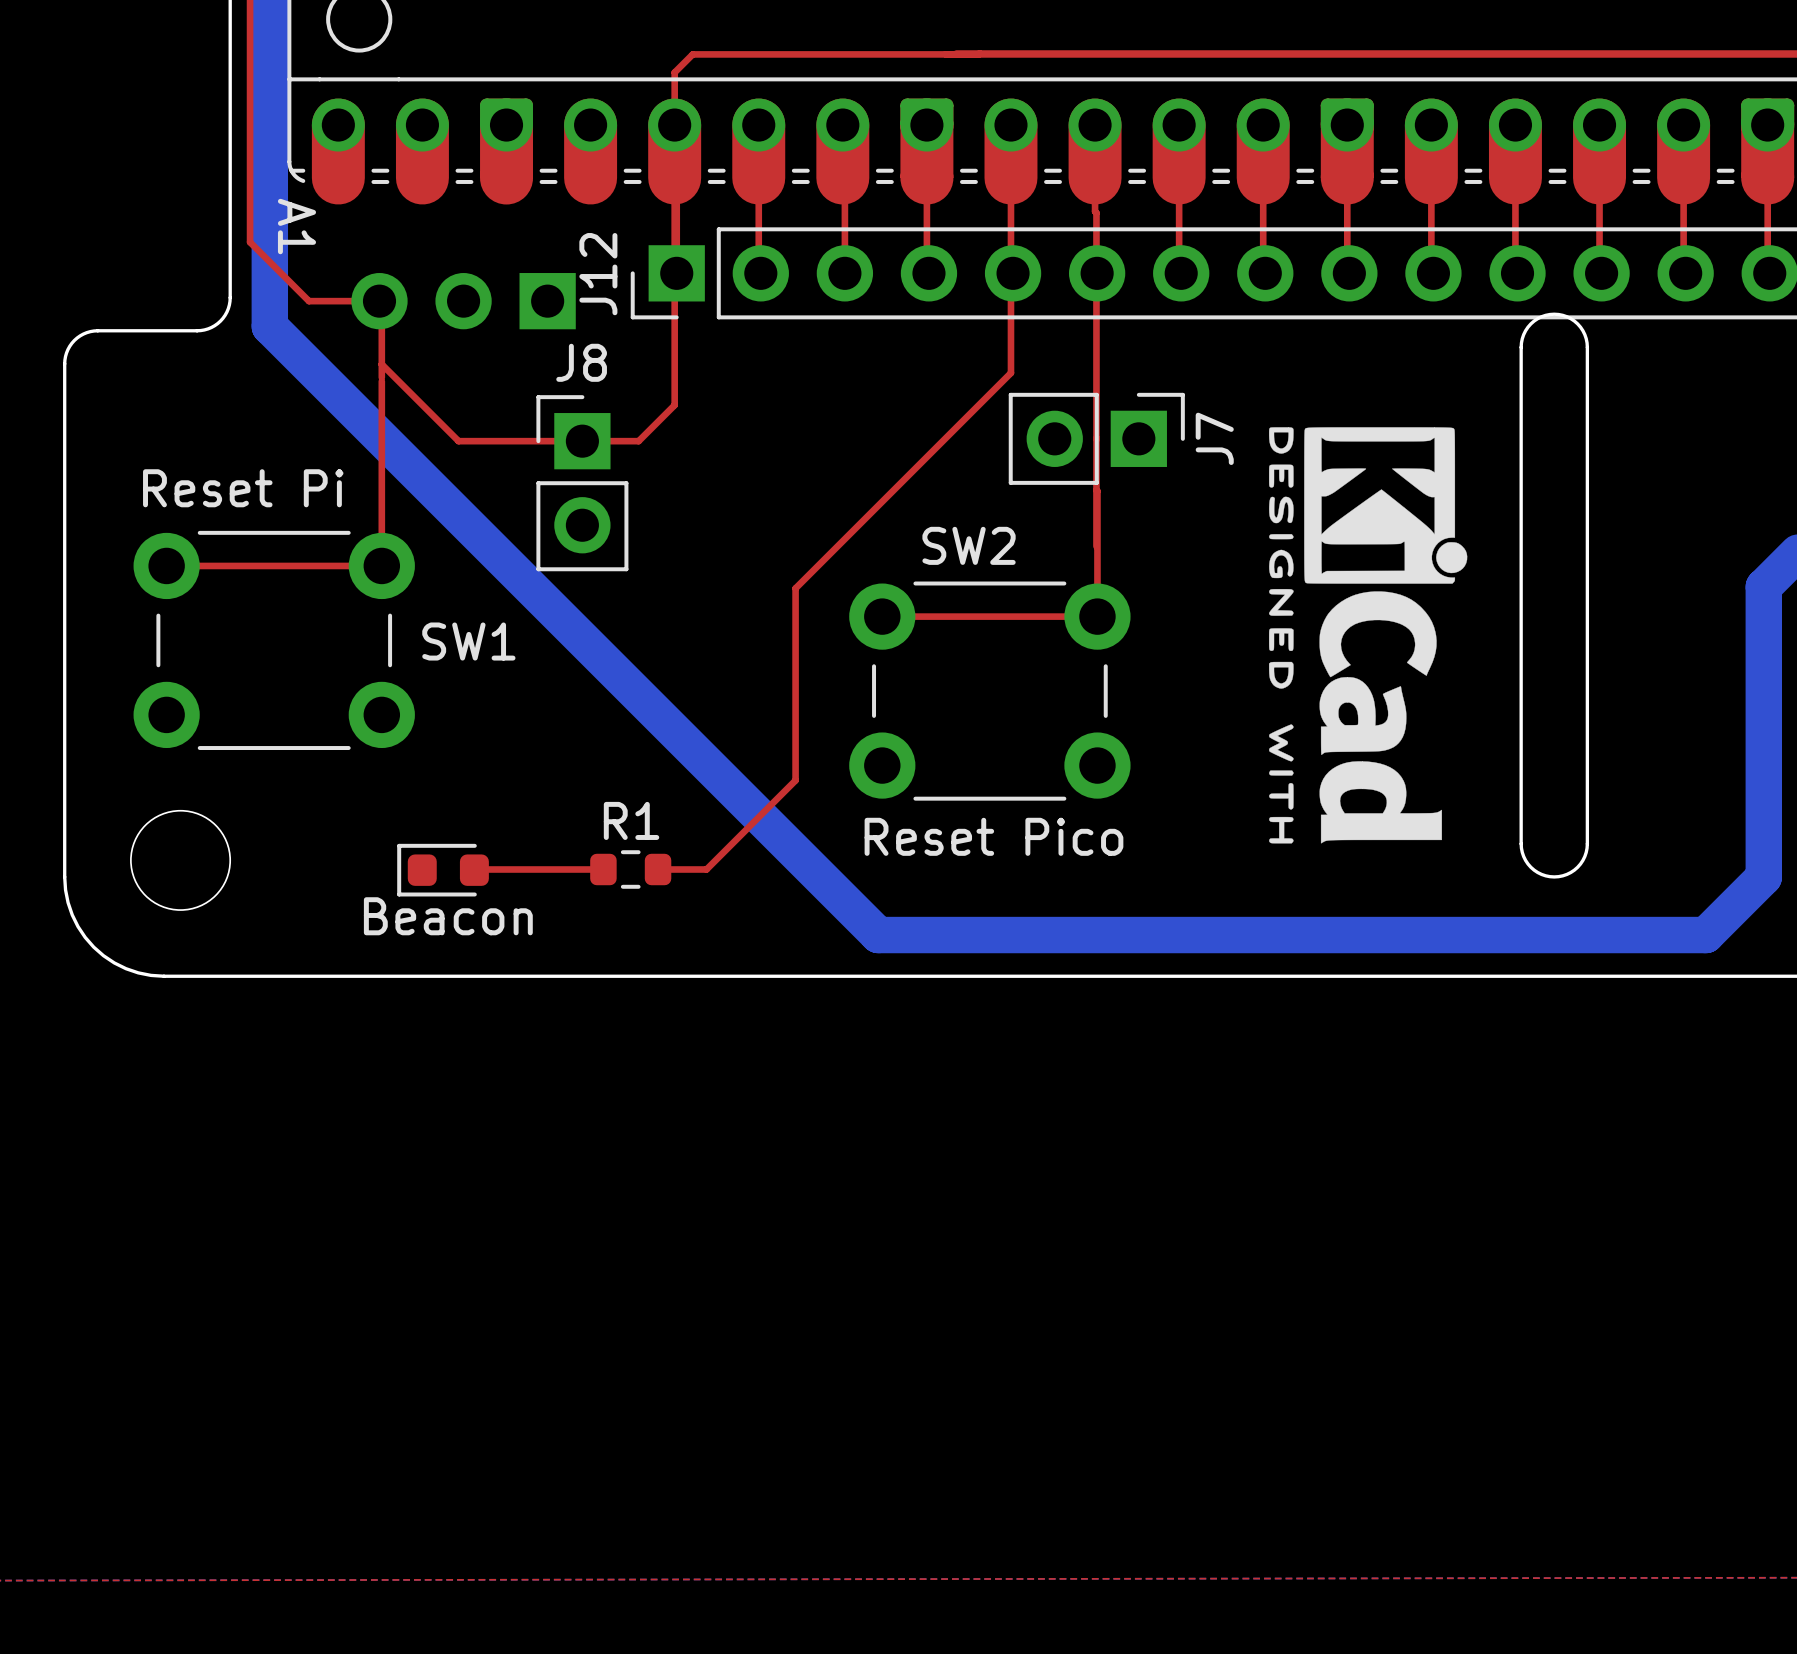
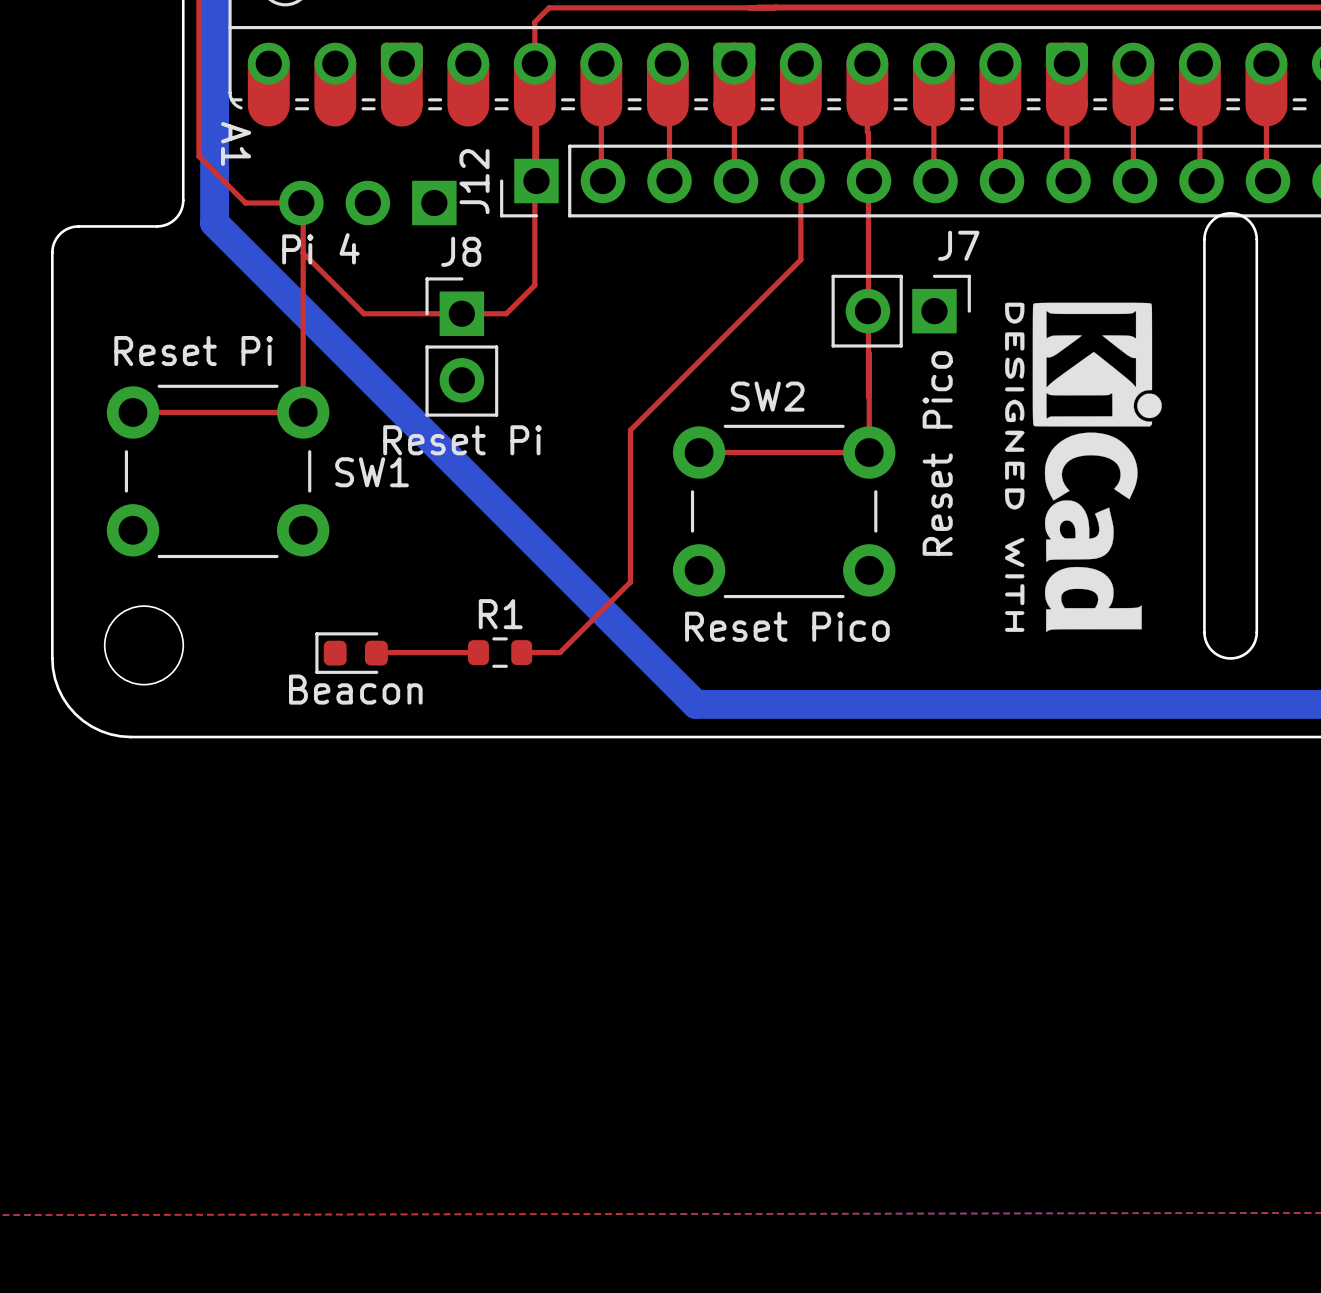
part value: none -> Pi 4 (320, 248)
J7 position: (1096, 438) -> (901, 311)
J7 name rotation: 0° (1214, 438) -> 90° clockwise (958, 245)
J7 name position: J7 (1214, 438) -> J7 (958, 245)
J8 value: none -> Reset Pi (462, 440)
J7 value: none -> Reset Pico (937, 453)

